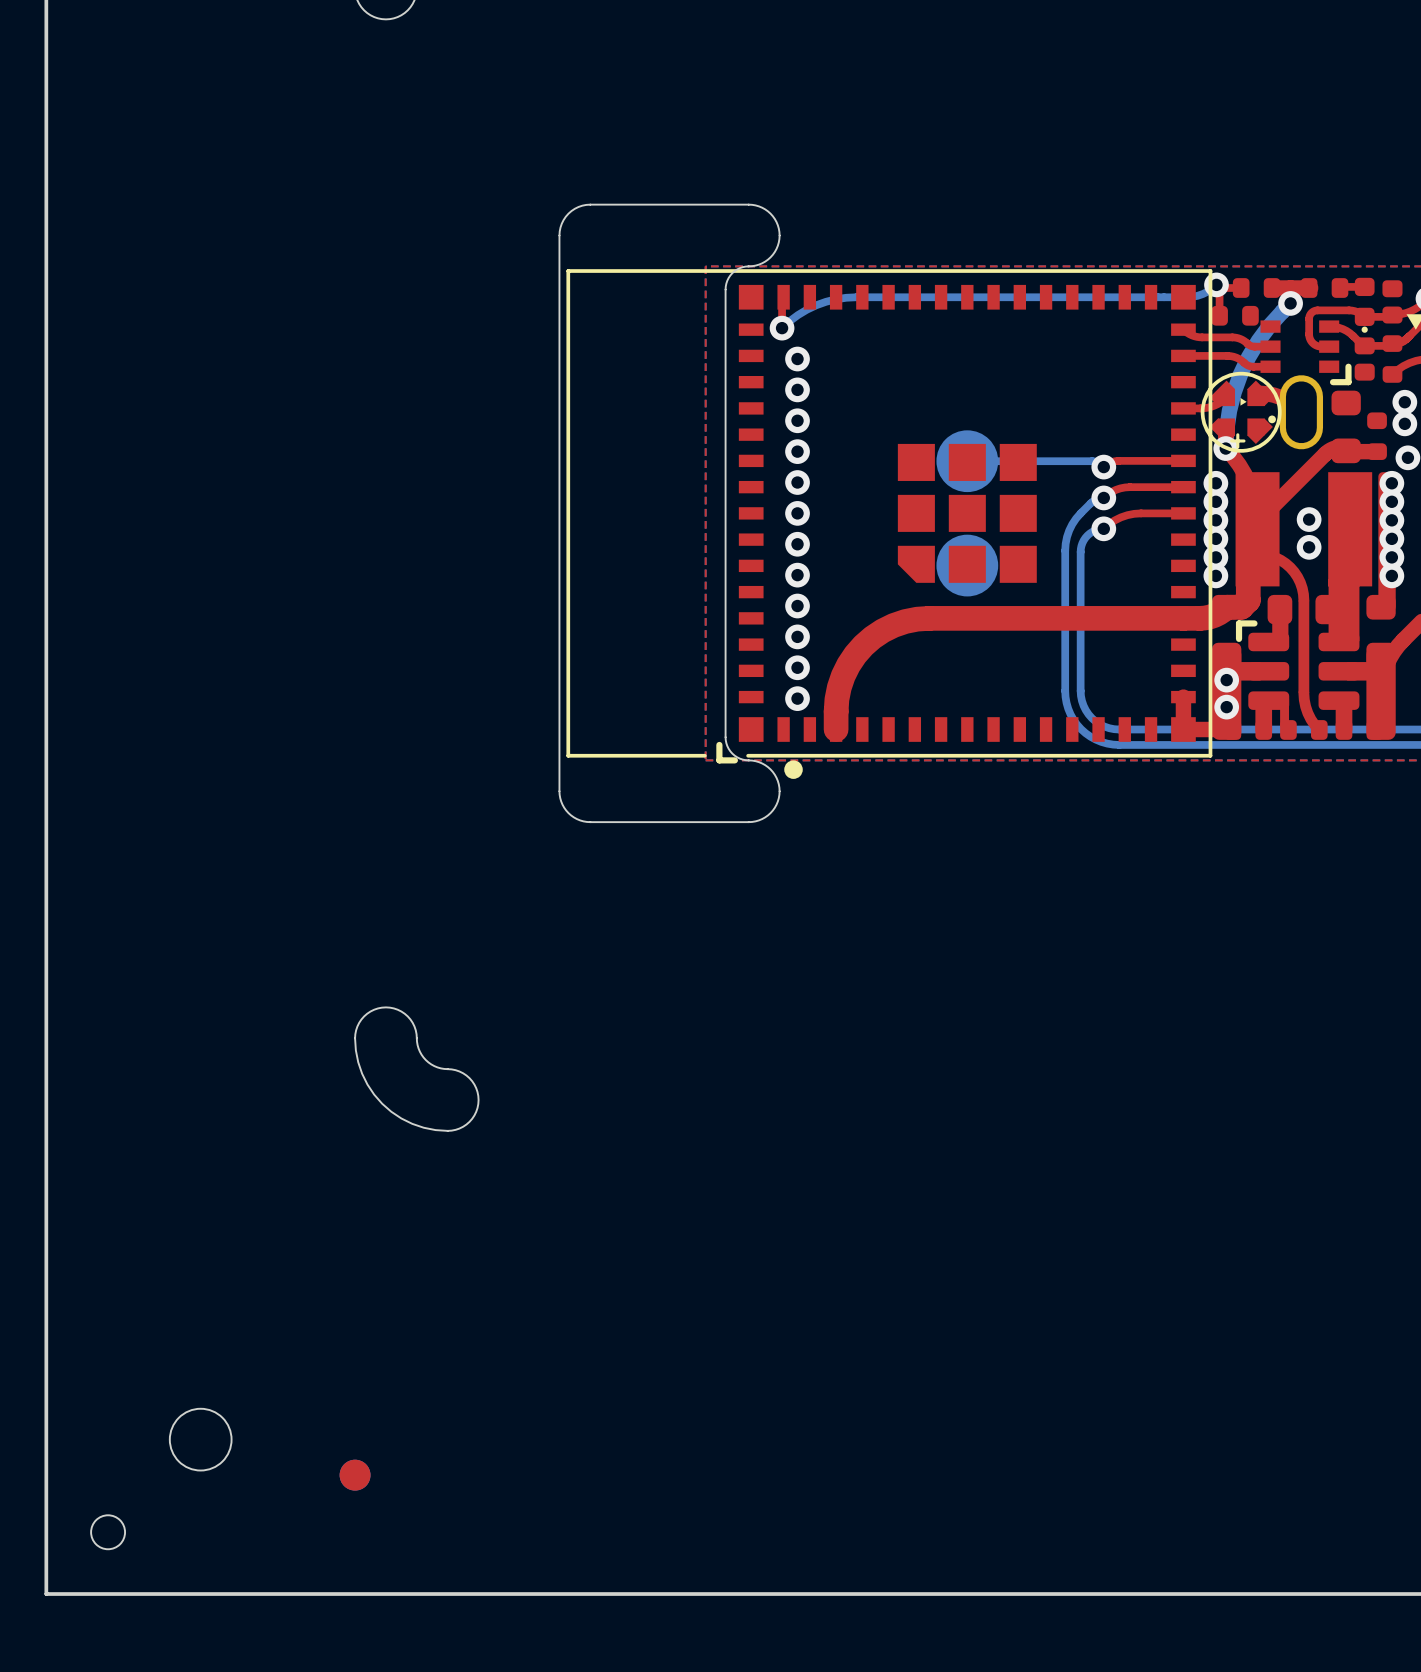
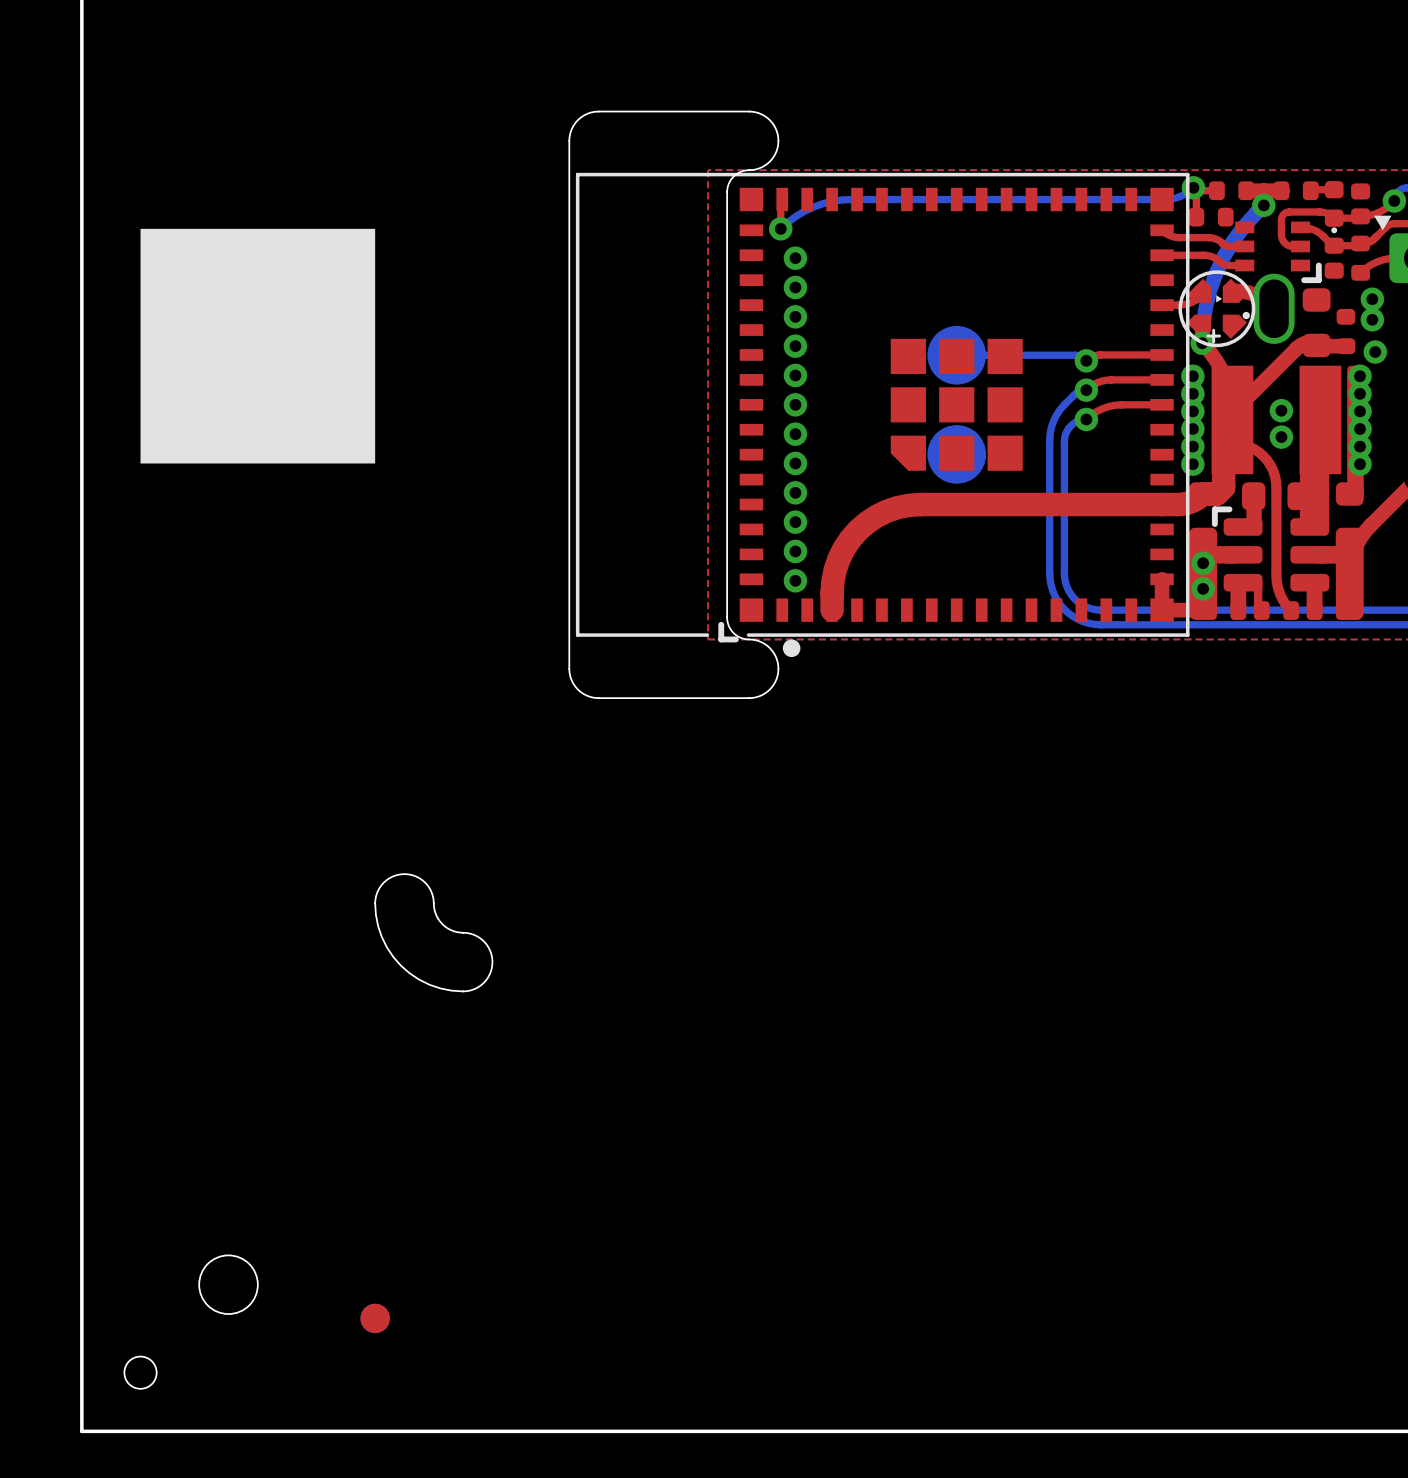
drawing: none -> [140, 228, 376, 464]

